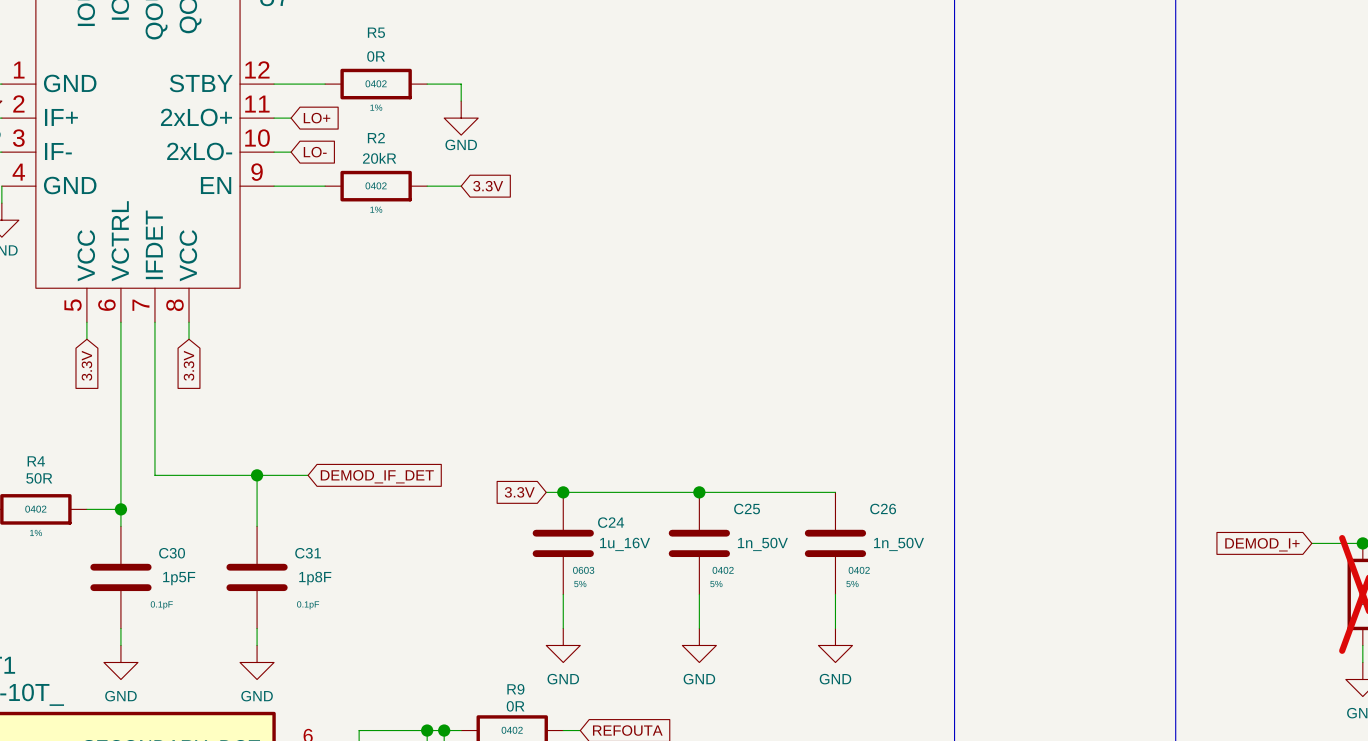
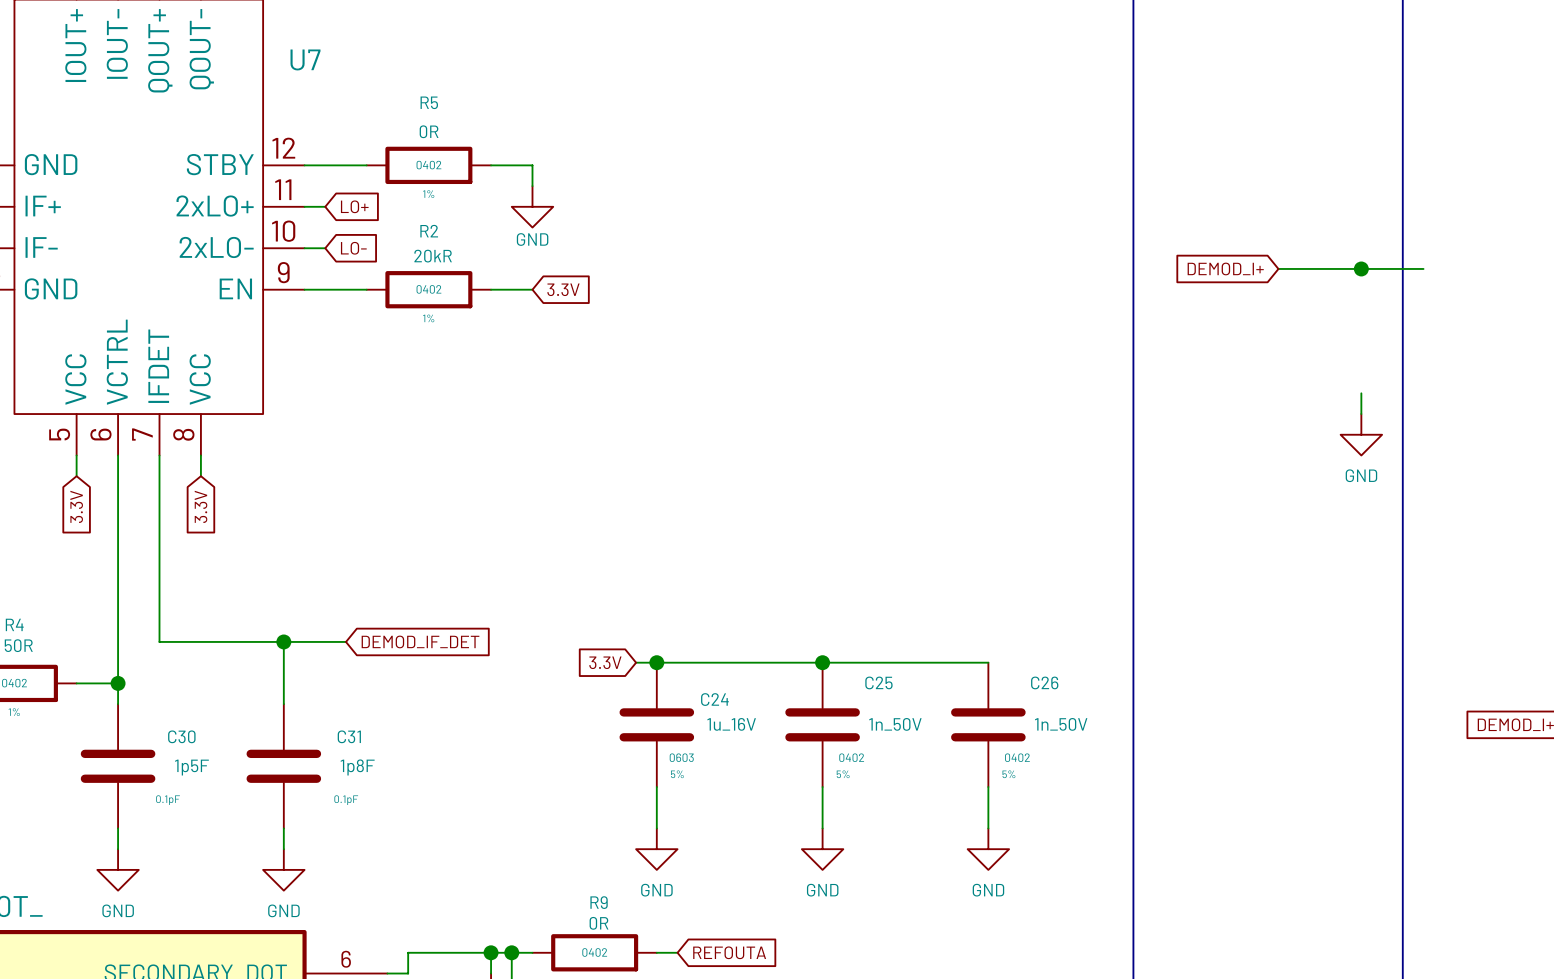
wire: none -> (1278, 268) (1423, 268)
junction: none -> (1361, 268)
global label: none -> DEMOD_I+ (1225, 268)
wire: none -> (1361, 393) (1361, 414)
power symbol: none -> GND (1361, 434)

